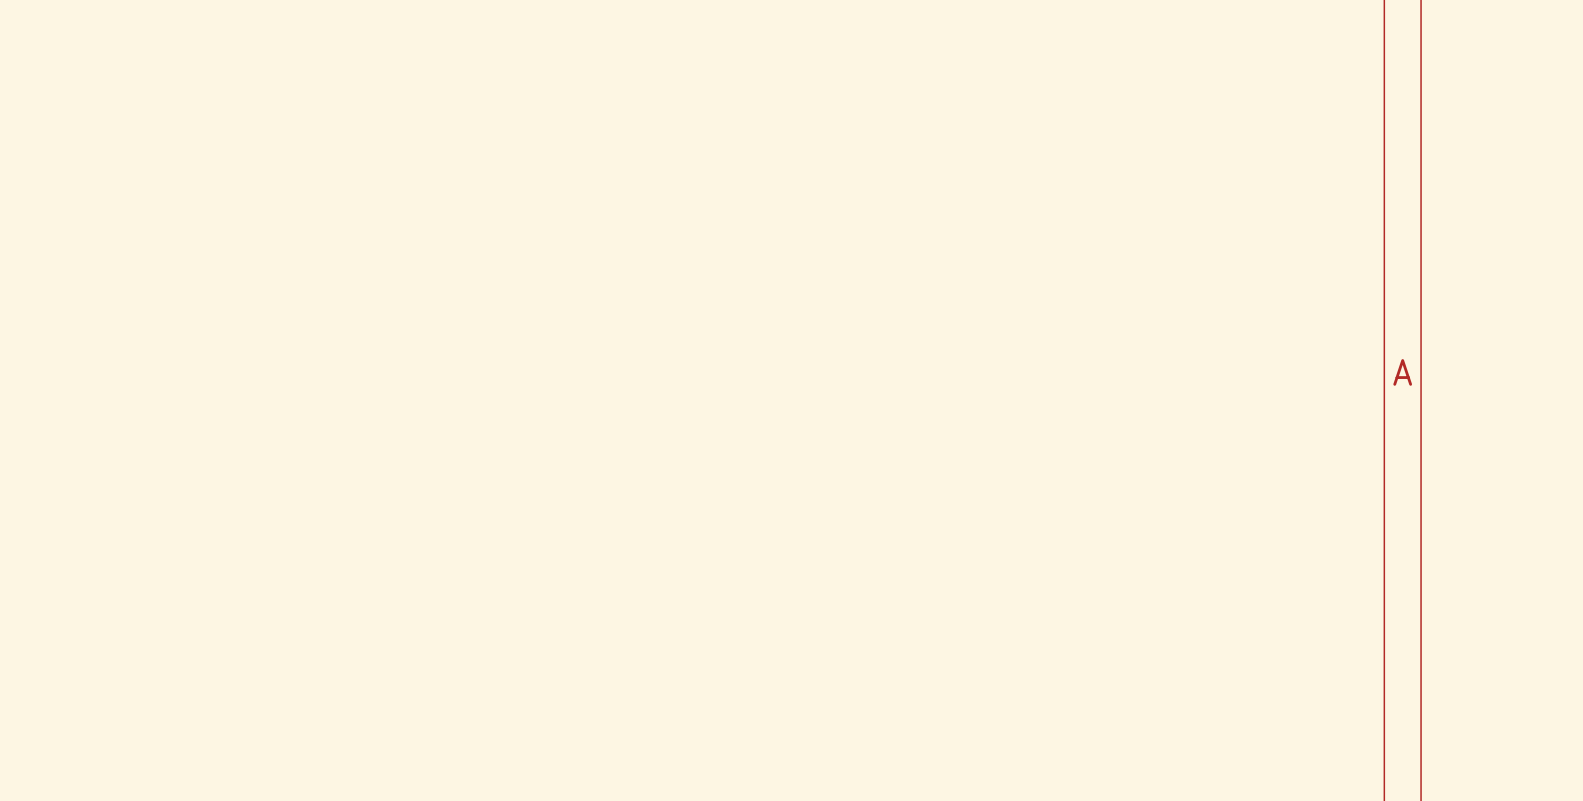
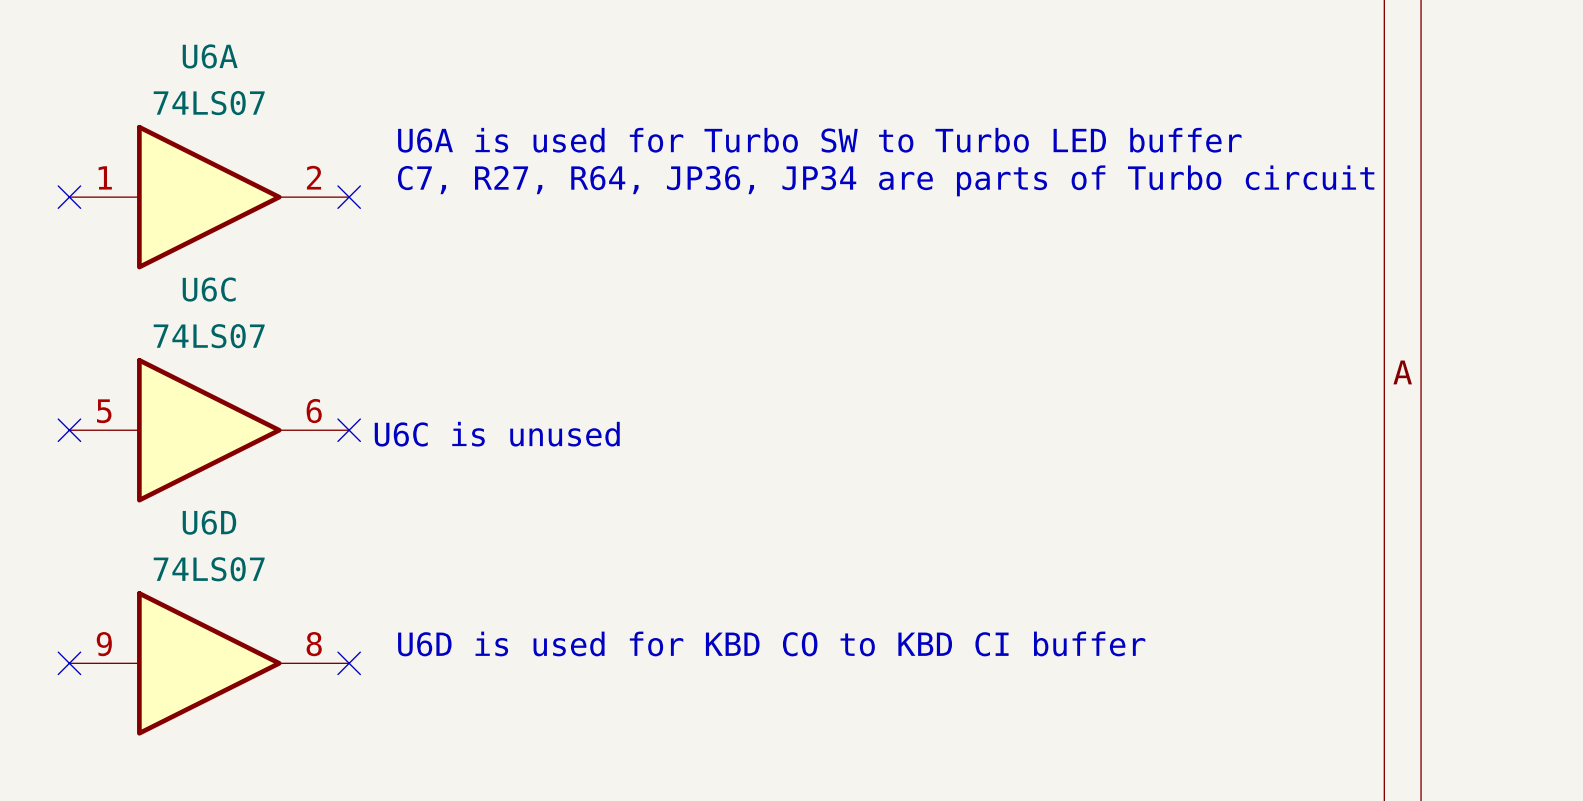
text: none -> U6A is used for Turbo SW to Turbo LED buffer (819, 140)
text: none -> C7, R27, R64, JP36, JP34 are parts of Turbo circuit (886, 180)
no-connect mark: none -> (69, 197)
U6A: none -> 74LS07 (209, 197)
no-connect mark: none -> (349, 197)
no-connect mark: none -> (69, 430)
U6C: none -> 74LS07 (209, 430)
no-connect mark: none -> (349, 430)
text: none -> U6C is unused (497, 434)
text: none -> U6D is used for KBD CO to KBD CI buffer (771, 643)
no-connect mark: none -> (69, 663)
U6D: none -> 74LS07 (209, 663)
no-connect mark: none -> (349, 663)

